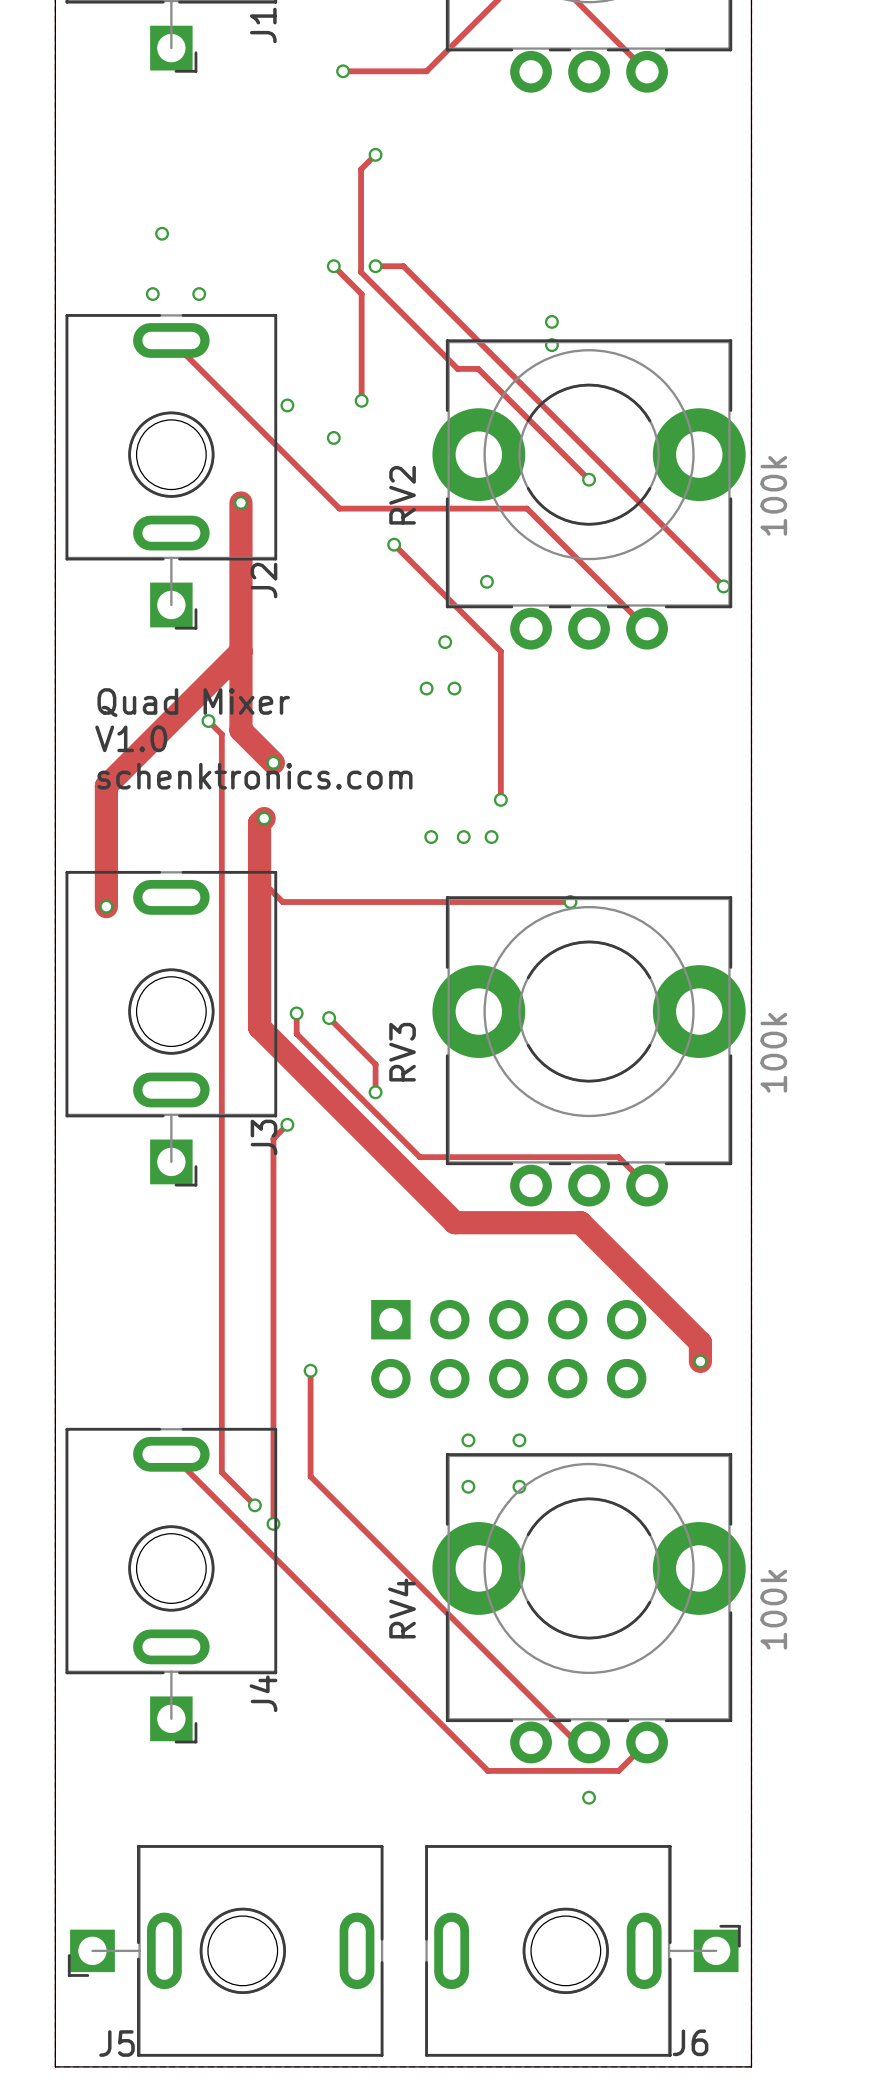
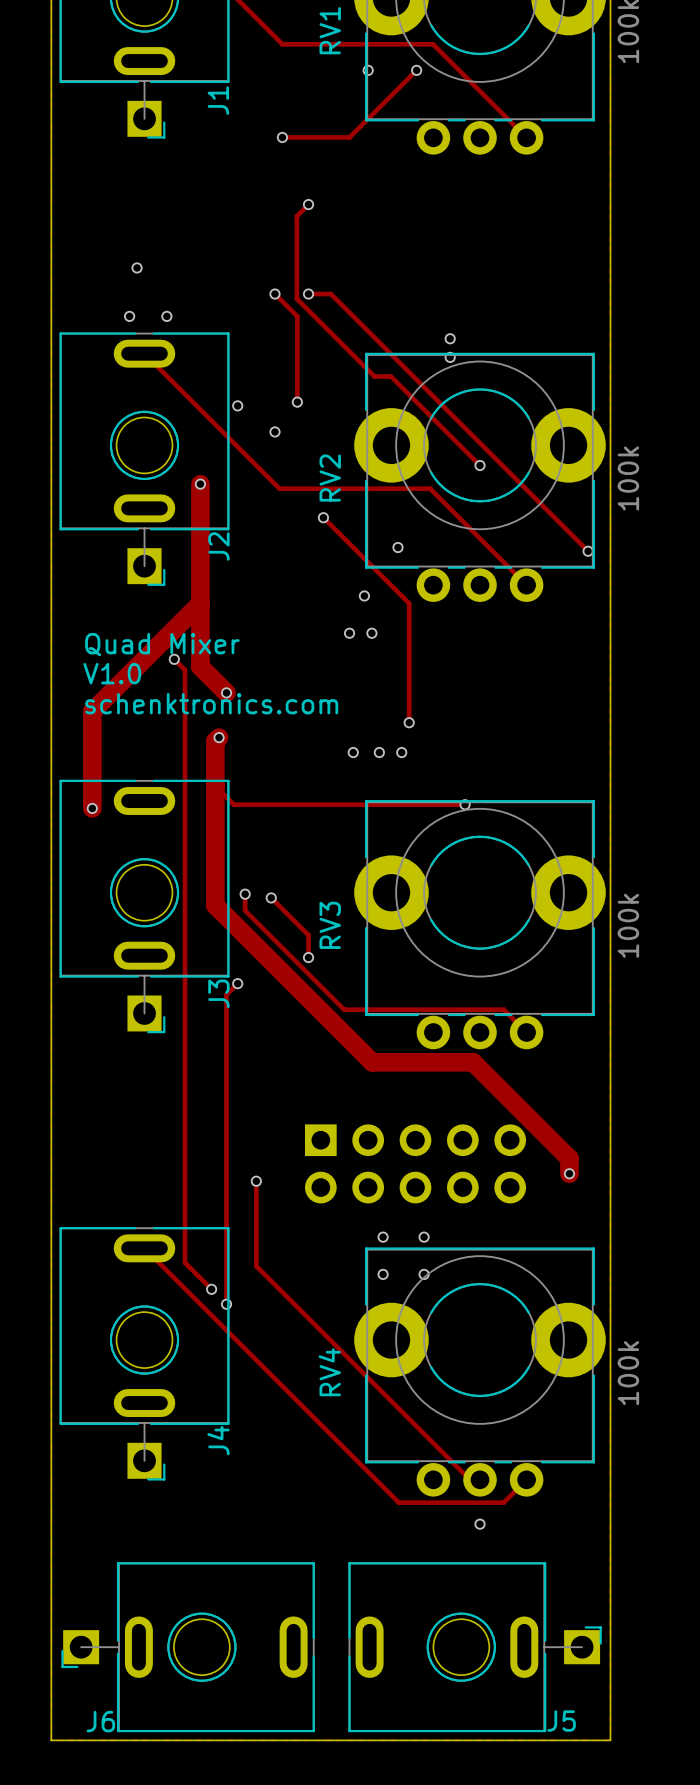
J6 name: J6 (690, 2042) -> J5 (561, 1721)
J5 name: J5 (116, 2043) -> J6 (100, 1721)

